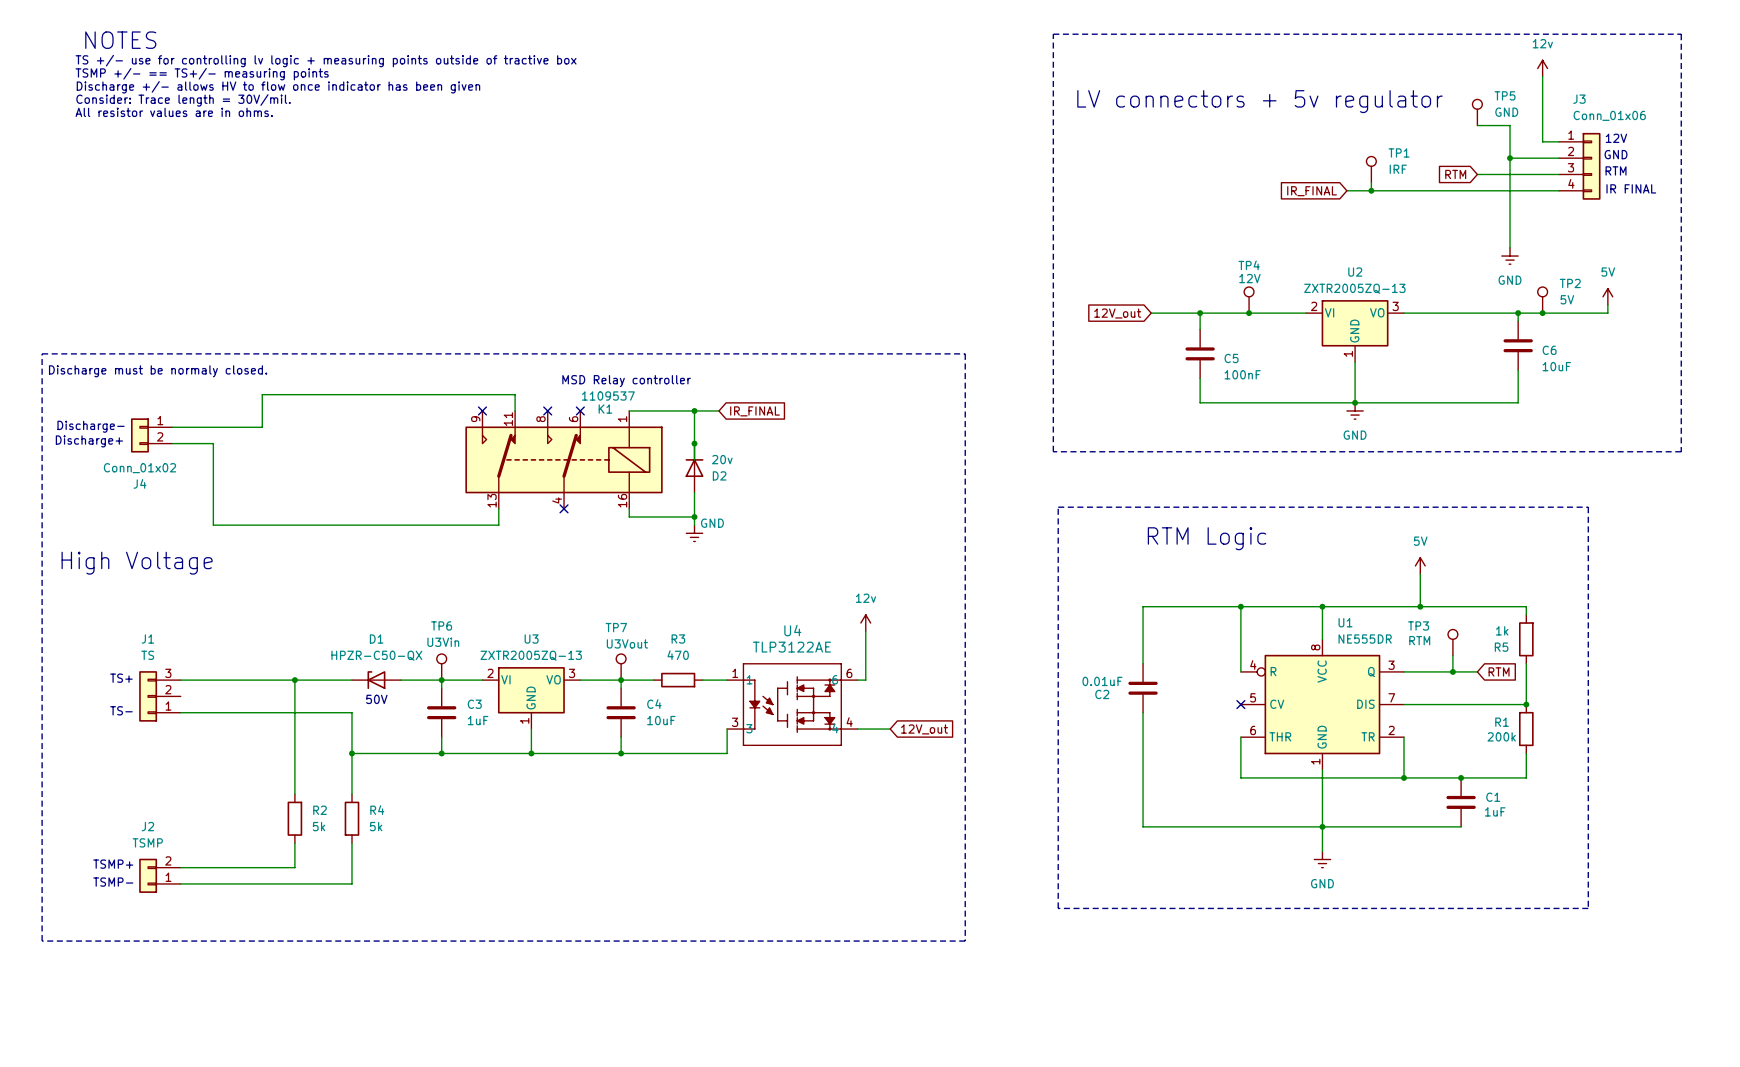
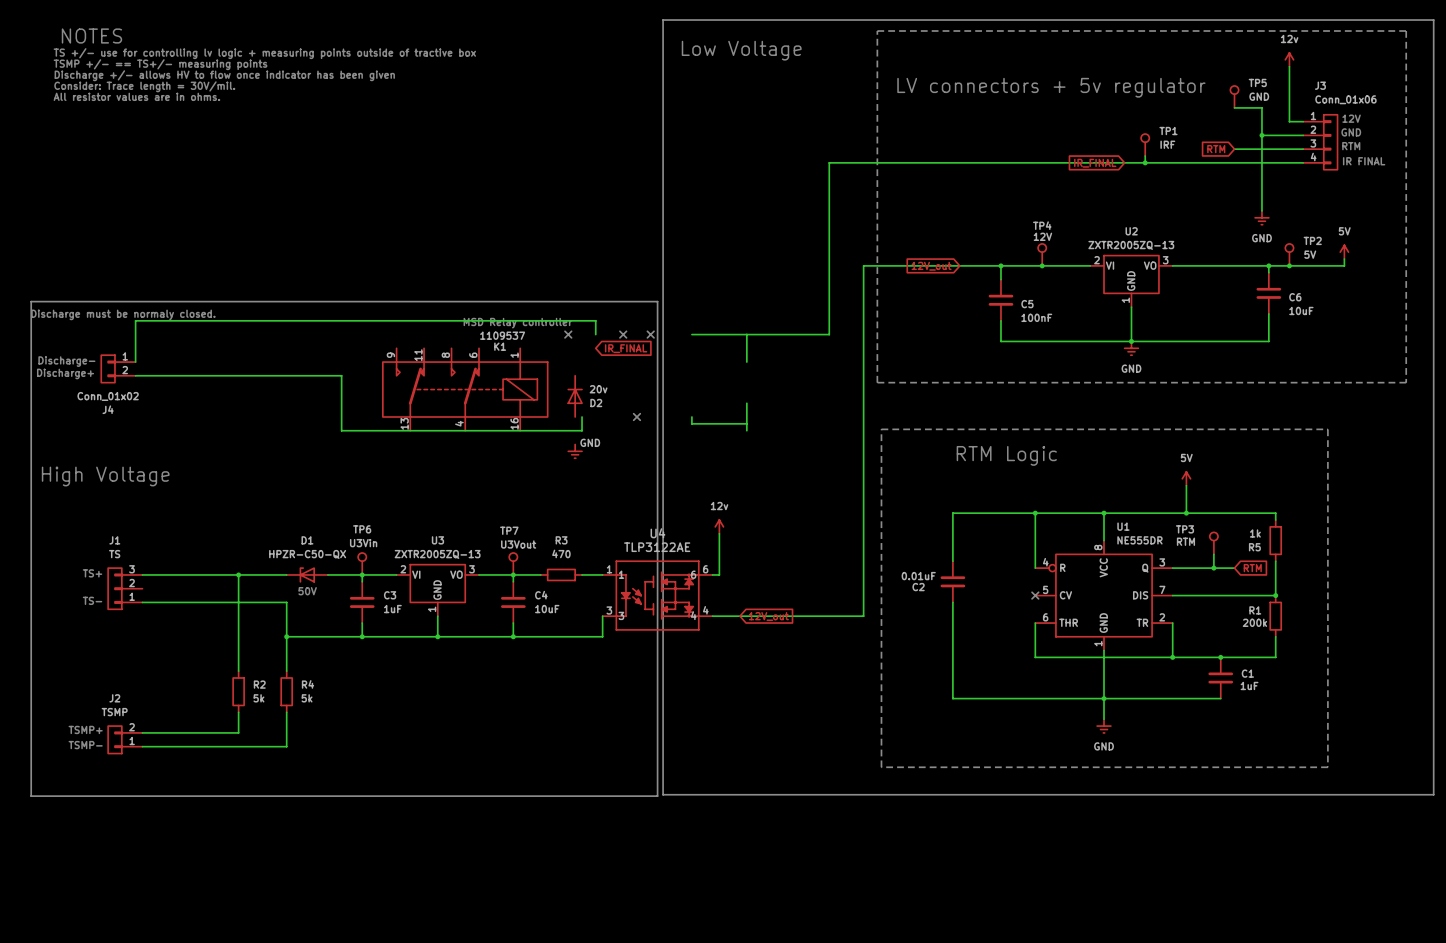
line: none -> (663, 20) (1433, 20) (1433, 794) (663, 794) (663, 20)
text: none -> Low Voltage (741, 50)
wire: none -> (1124, 162) (829, 162) (829, 334) (691, 334)
wire: none -> (959, 265) (863, 265) (863, 616) (739, 616)
line: (42, 353) (965, 353) (965, 941) (42, 941) (42, 353) -> (31, 301) (31, 796) (657, 796) (657, 301) (31, 301)
no-connect mark: none -> (568, 334)
no-connect mark: none -> (623, 334)
no-connect mark: none -> (650, 334)
wire: none -> (746, 334) (746, 362)
no-connect mark: (482, 410) -> none
wire: (515, 410) (515, 394) (262, 394) (262, 427) (172, 427) -> (595, 334) (595, 320) (135, 320) (135, 362)
no-connect mark: (547, 410) -> none
no-connect mark: (580, 410) -> none
wire: (629, 410) (718, 410) -> none
wire: (694, 410) (694, 459) -> none
junction: (694, 410) -> none
wire: (213, 443) (213, 525) (498, 525) (498, 508) -> (169, 375) (341, 375) (341, 430) (582, 430) (582, 417)
junction: (694, 443) -> none
wire: none -> (746, 403) (746, 430)
wire: (694, 492) (694, 525) -> none
no-connect mark: none -> (636, 417)
wire: none -> (691, 417) (691, 423) (746, 423)
no-connect mark: (564, 508) -> none
wire: (629, 508) (629, 516) (694, 516) -> none
junction: (694, 516) -> none

